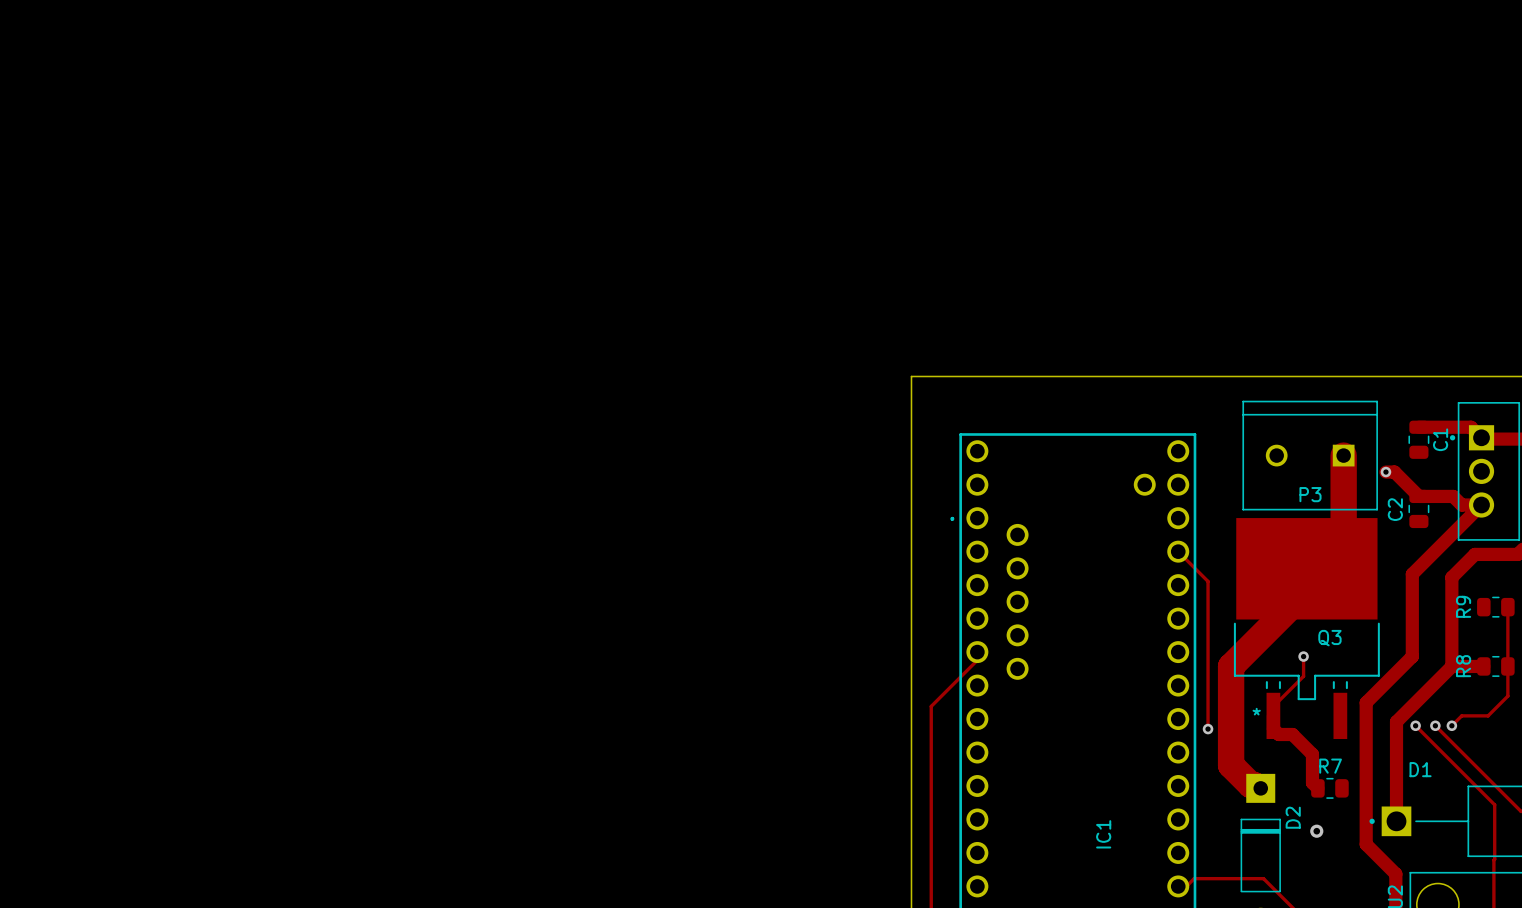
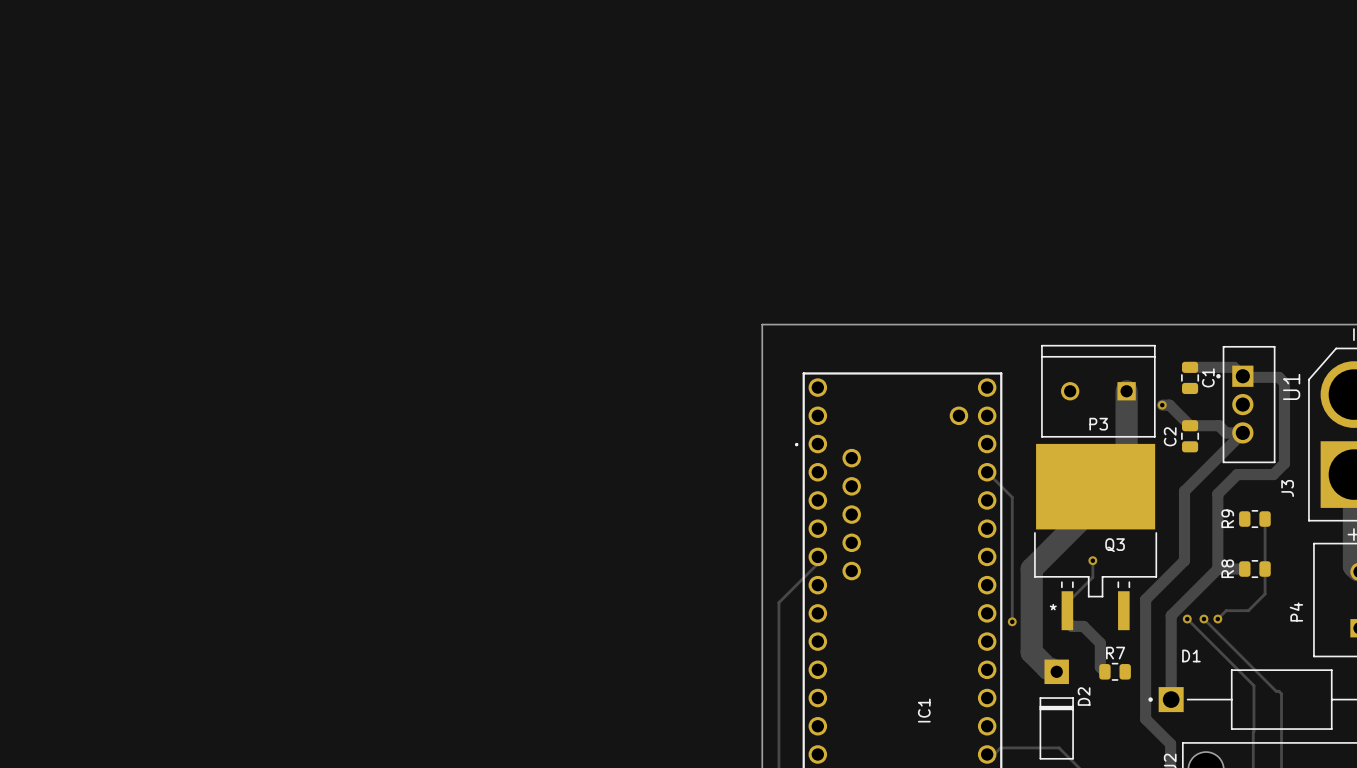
via: (1316, 831) -> none

